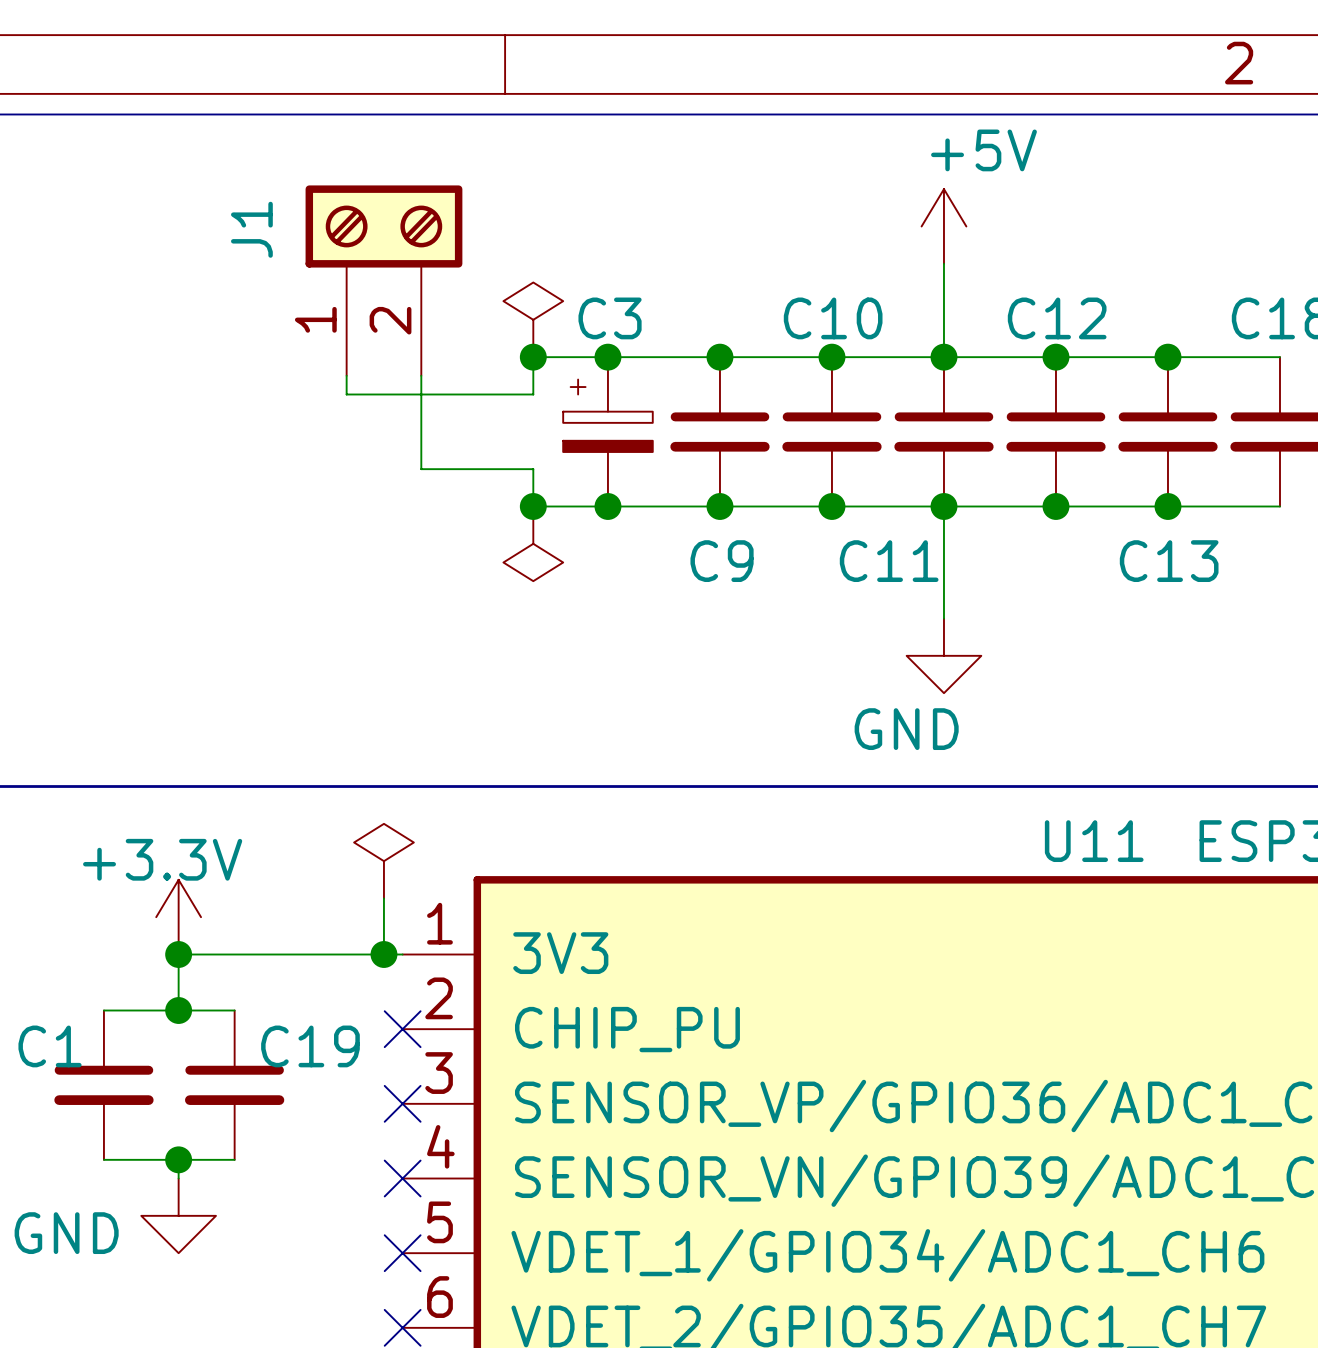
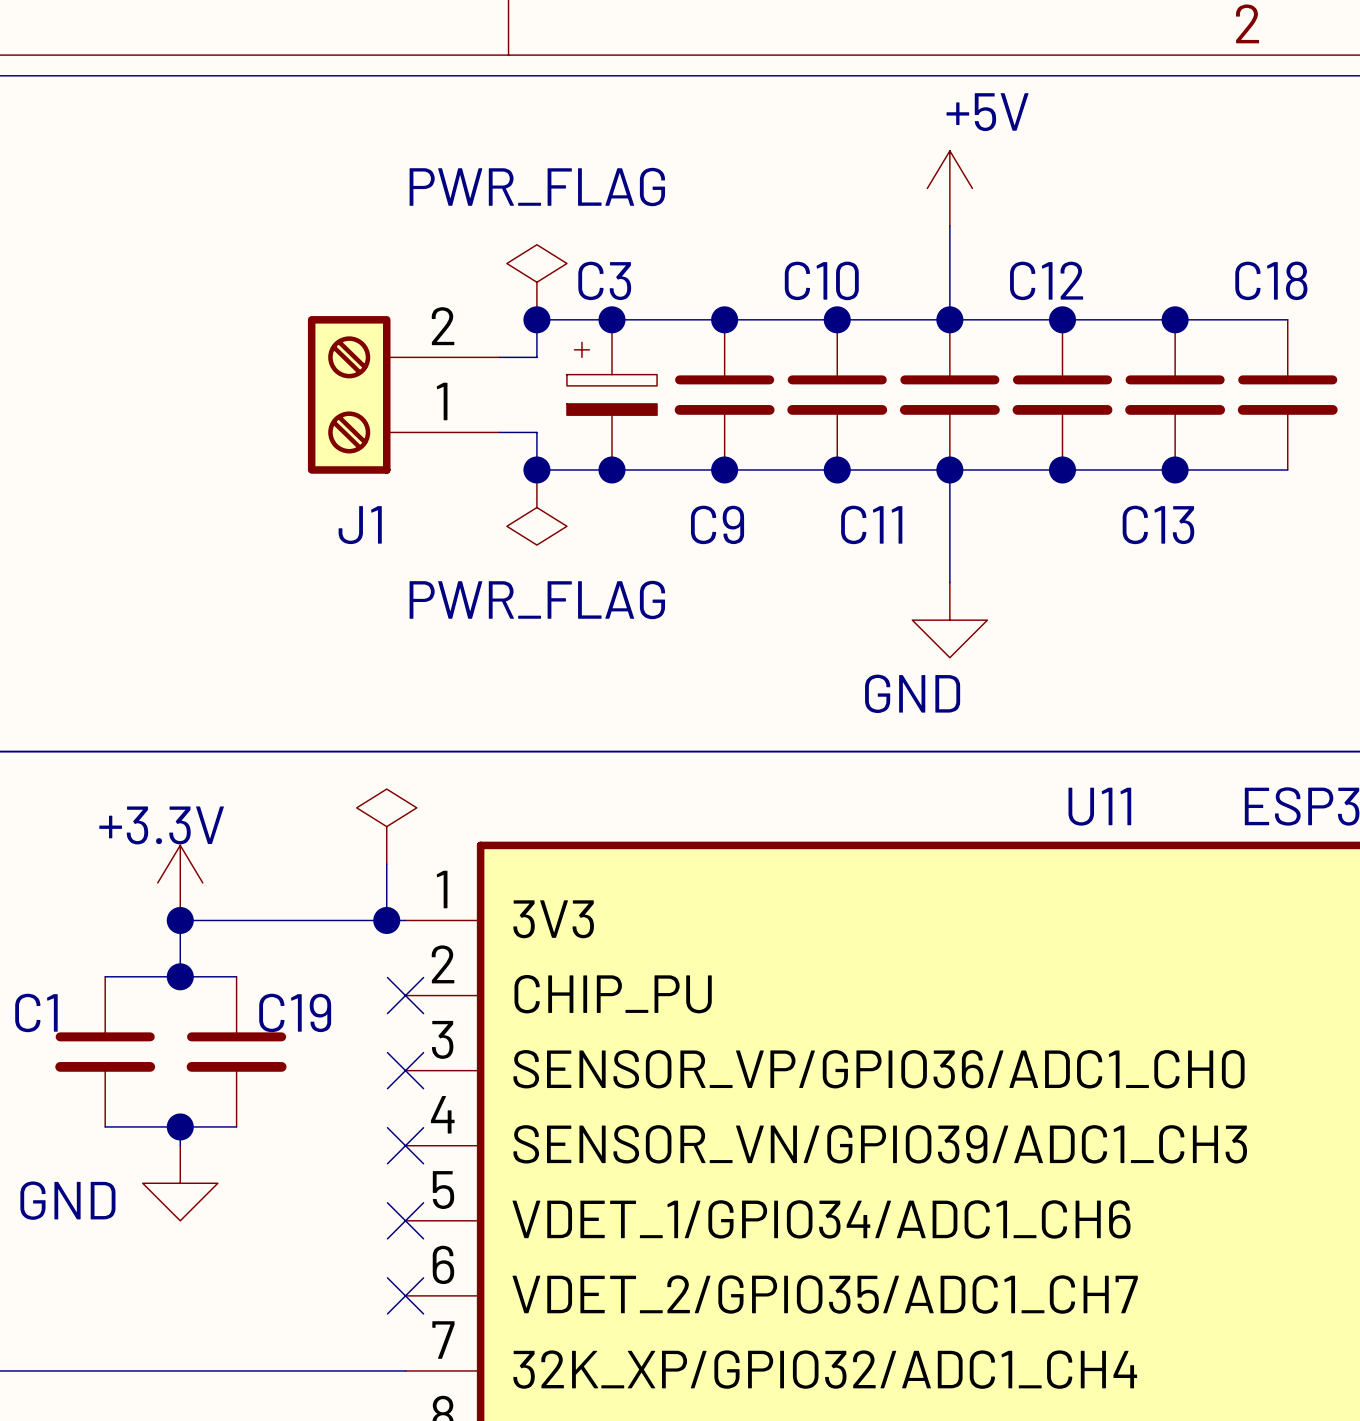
J1 rotation: 0° (383, 226) -> 90° counterclockwise (349, 394)
power symbol text: none -> PWR_FLAG (537, 187)
J1 position: (383, 280) -> (403, 394)
wire: (421, 375) (421, 469) (495, 469) -> none
power symbol text: none -> PWR_FLAG (537, 599)

